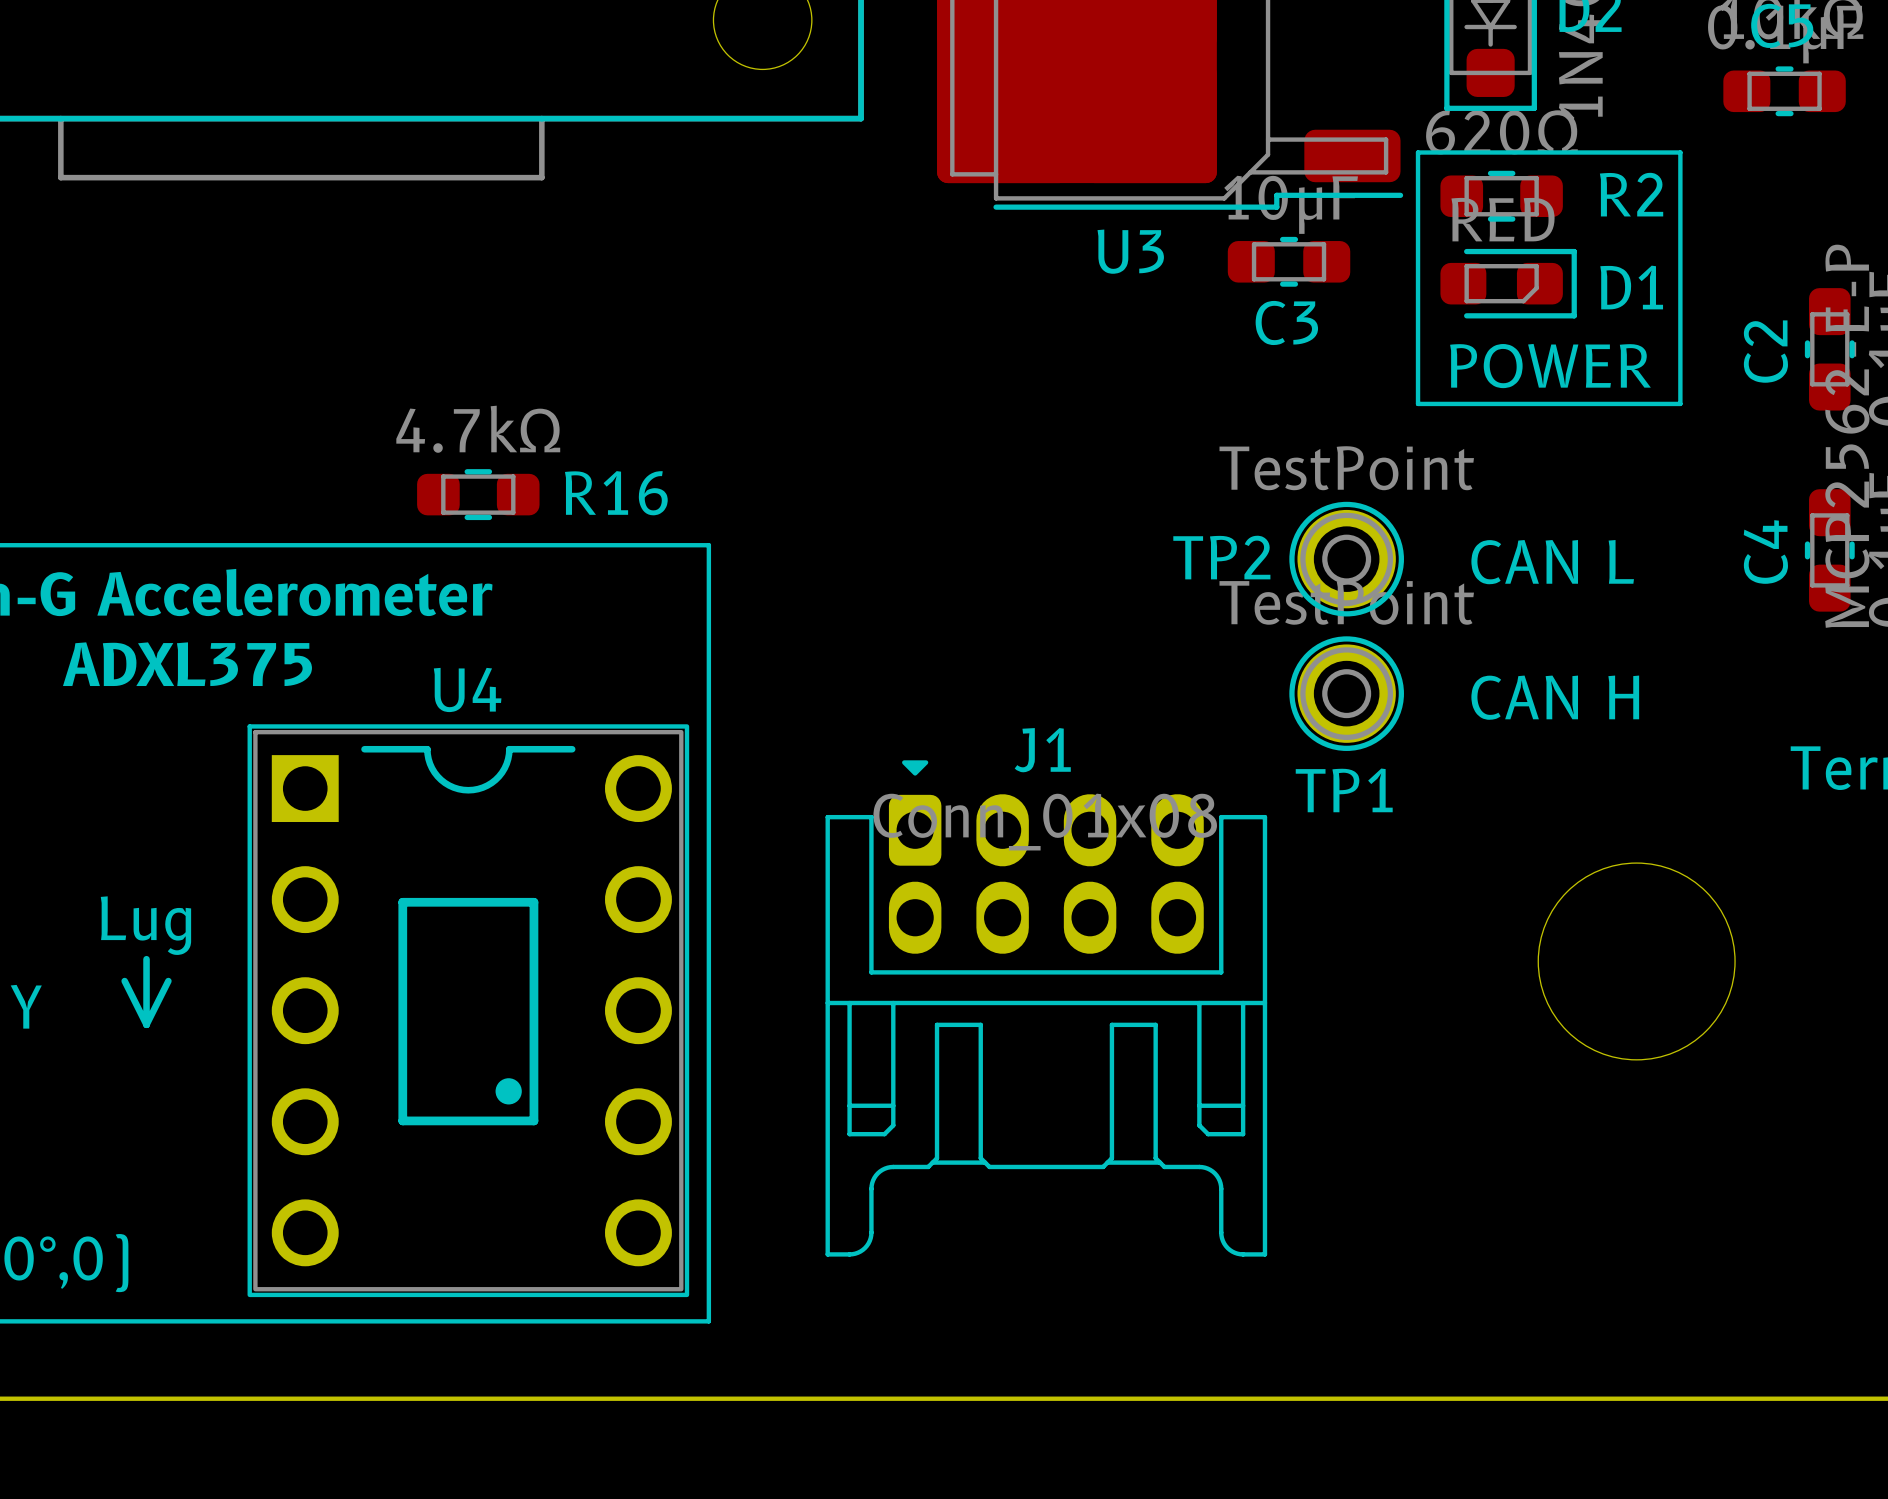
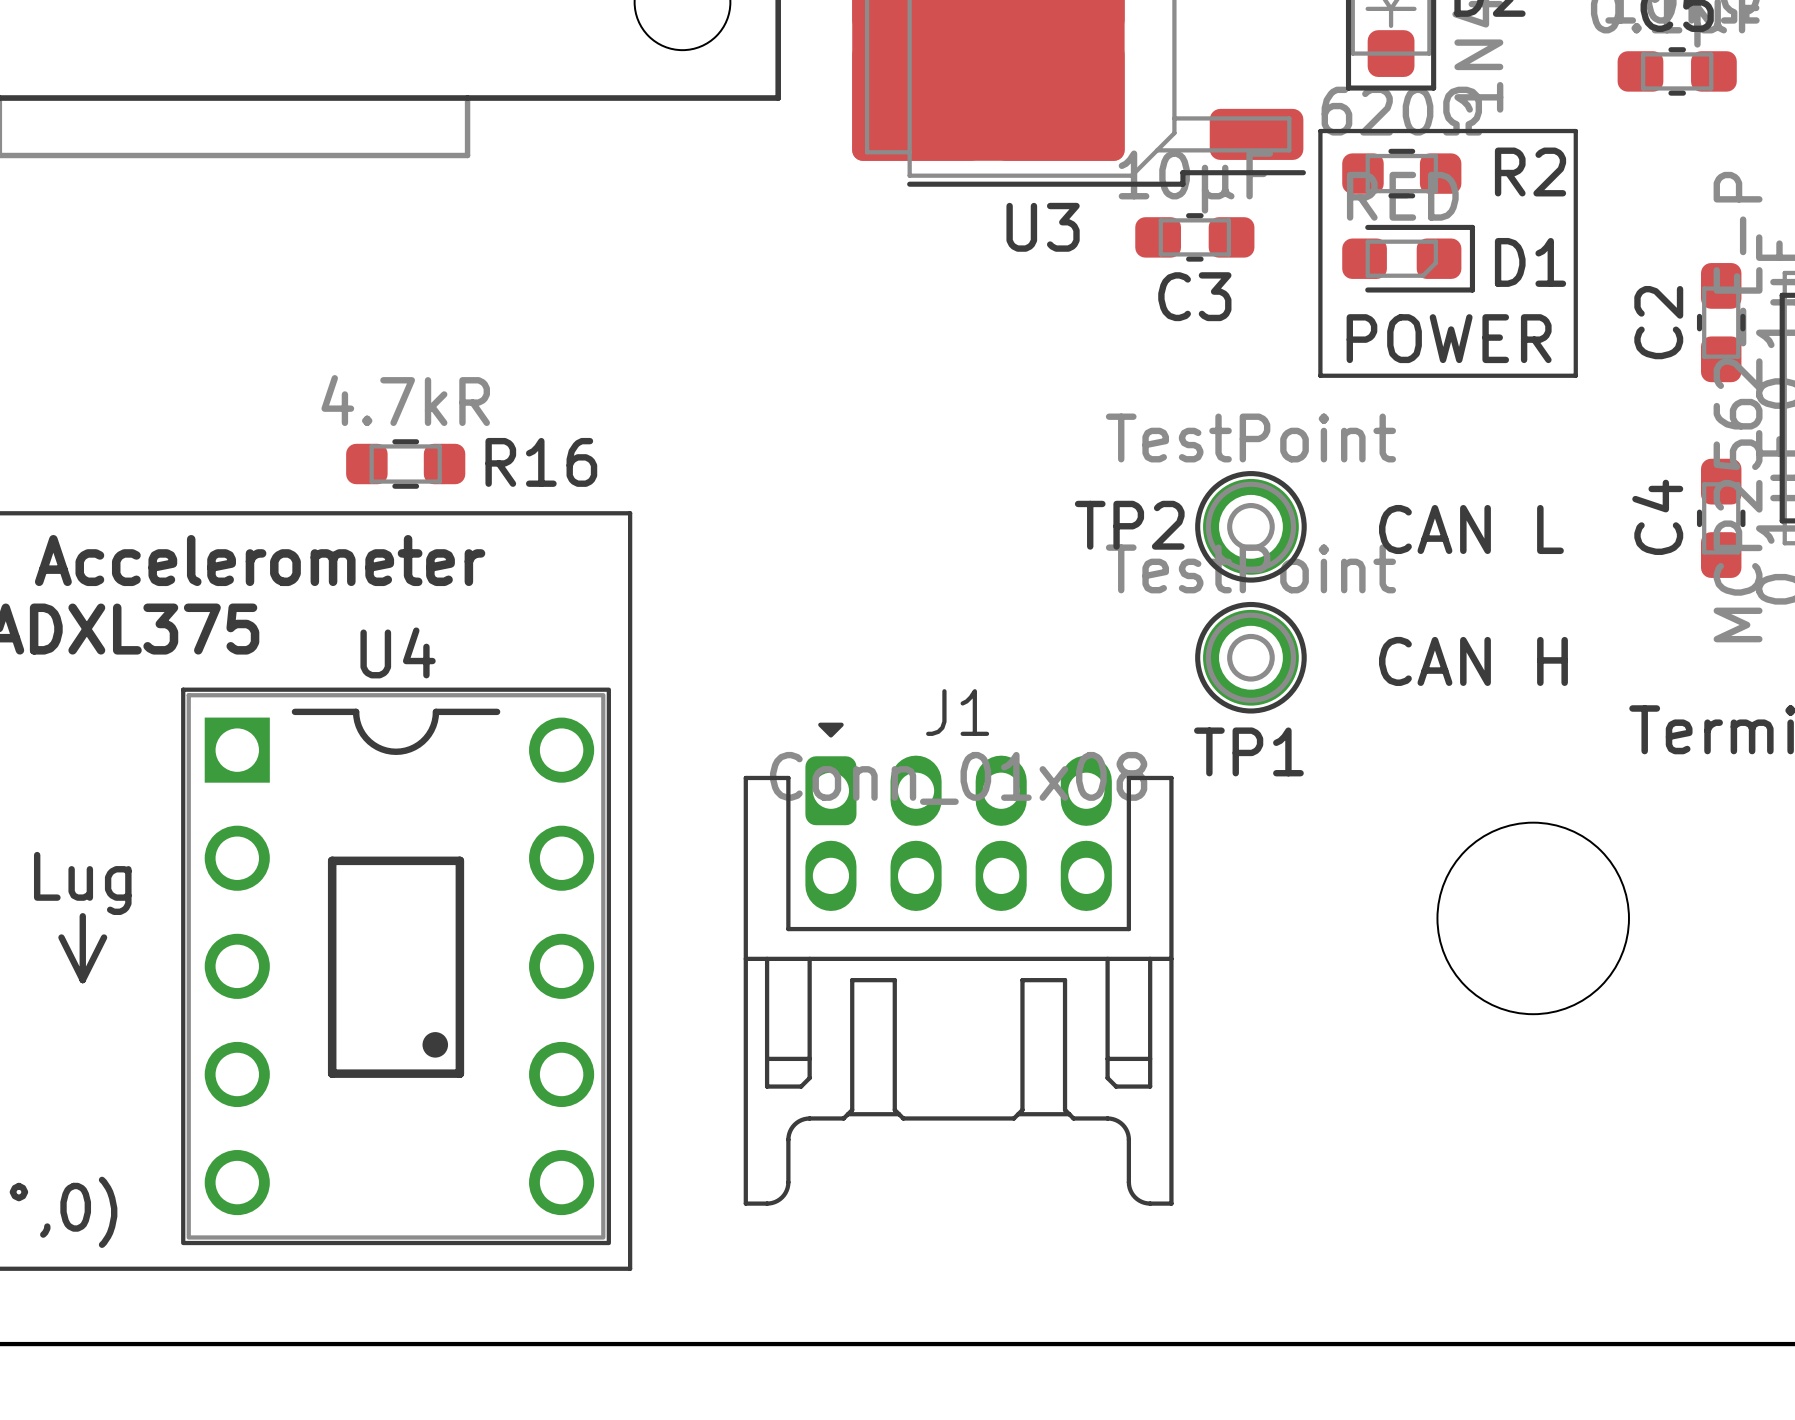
R16 value: 4.7kΩ (478, 429) -> 4.7kR (405, 400)

